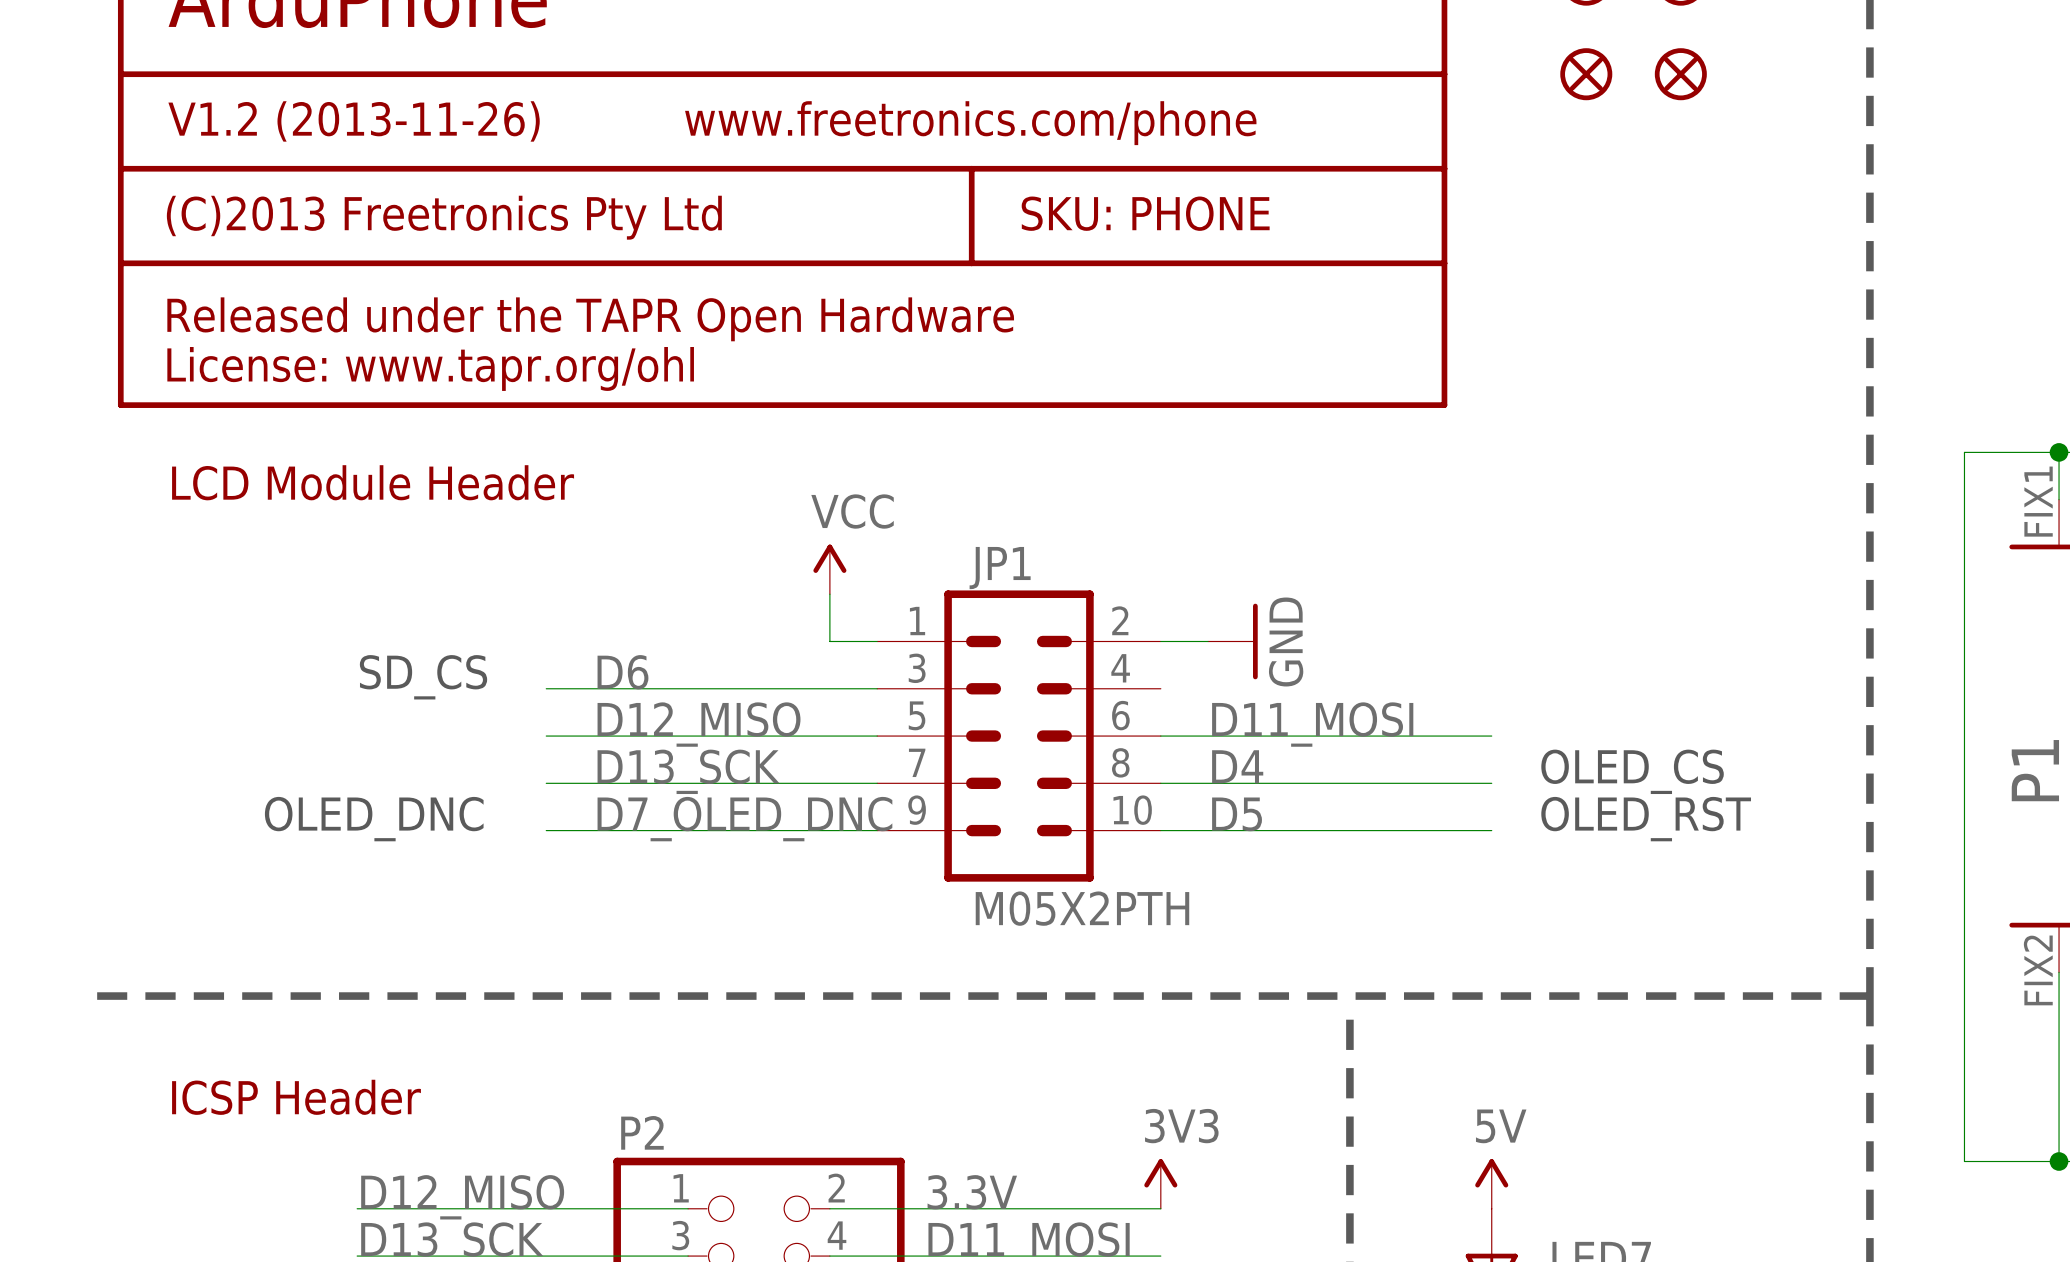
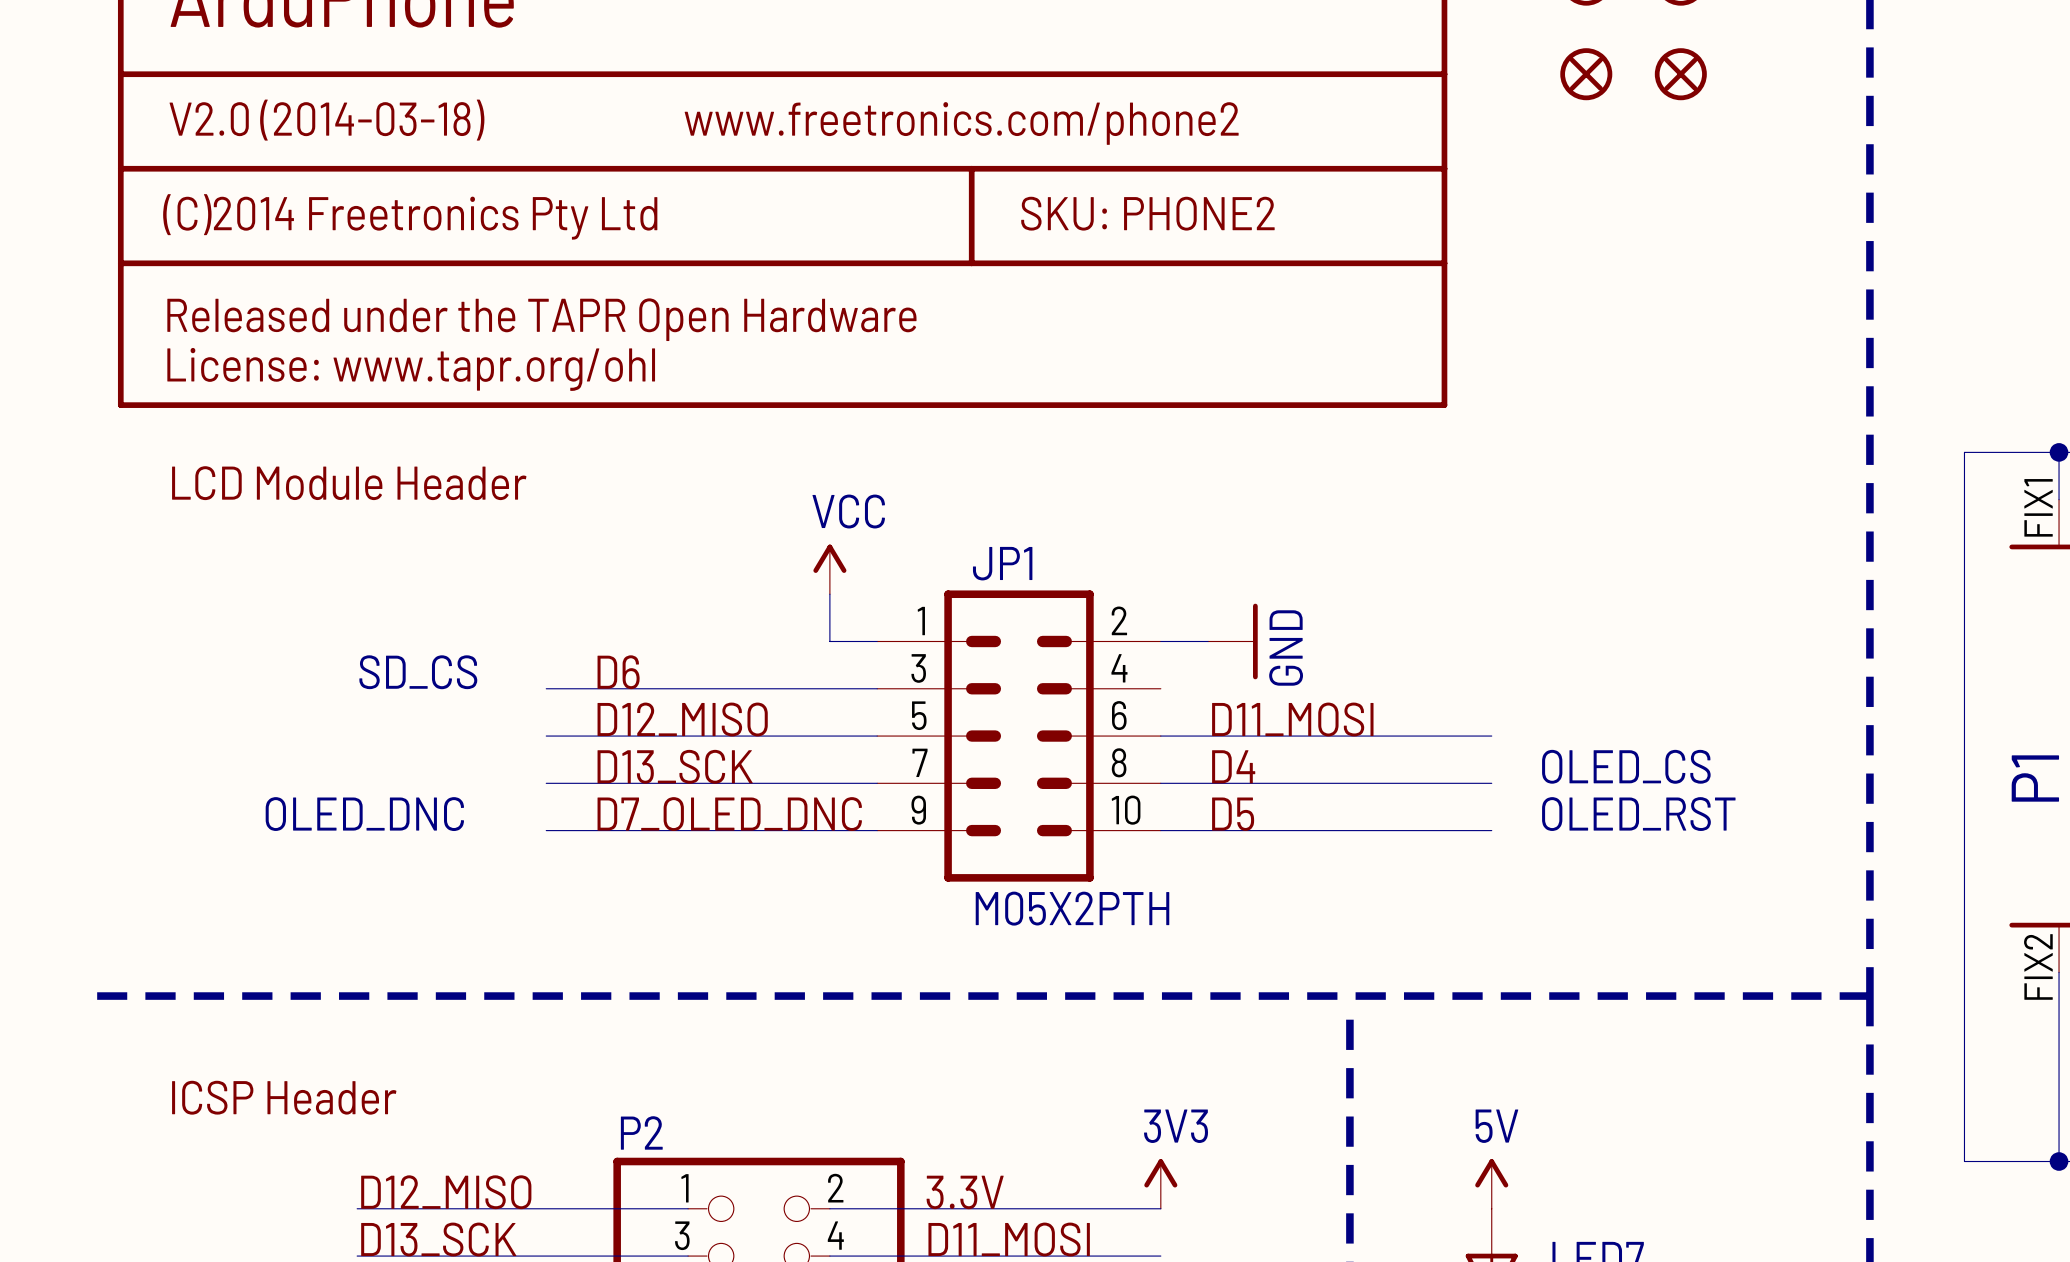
text: V1.2 (2013-11-26) (354, 121) -> V2.0 (2014-03-18) (326, 120)
text: www.freetronics.com/phone (970, 123) -> www.freetronics.com/phone2 (961, 123)
text: SKU: PHONE (1145, 213) -> SKU: PHONE2 (1147, 213)
text: (C)2013 Freetronics Pty Ltd (444, 217) -> (C)2014 Freetronics Pty Ltd (410, 216)

